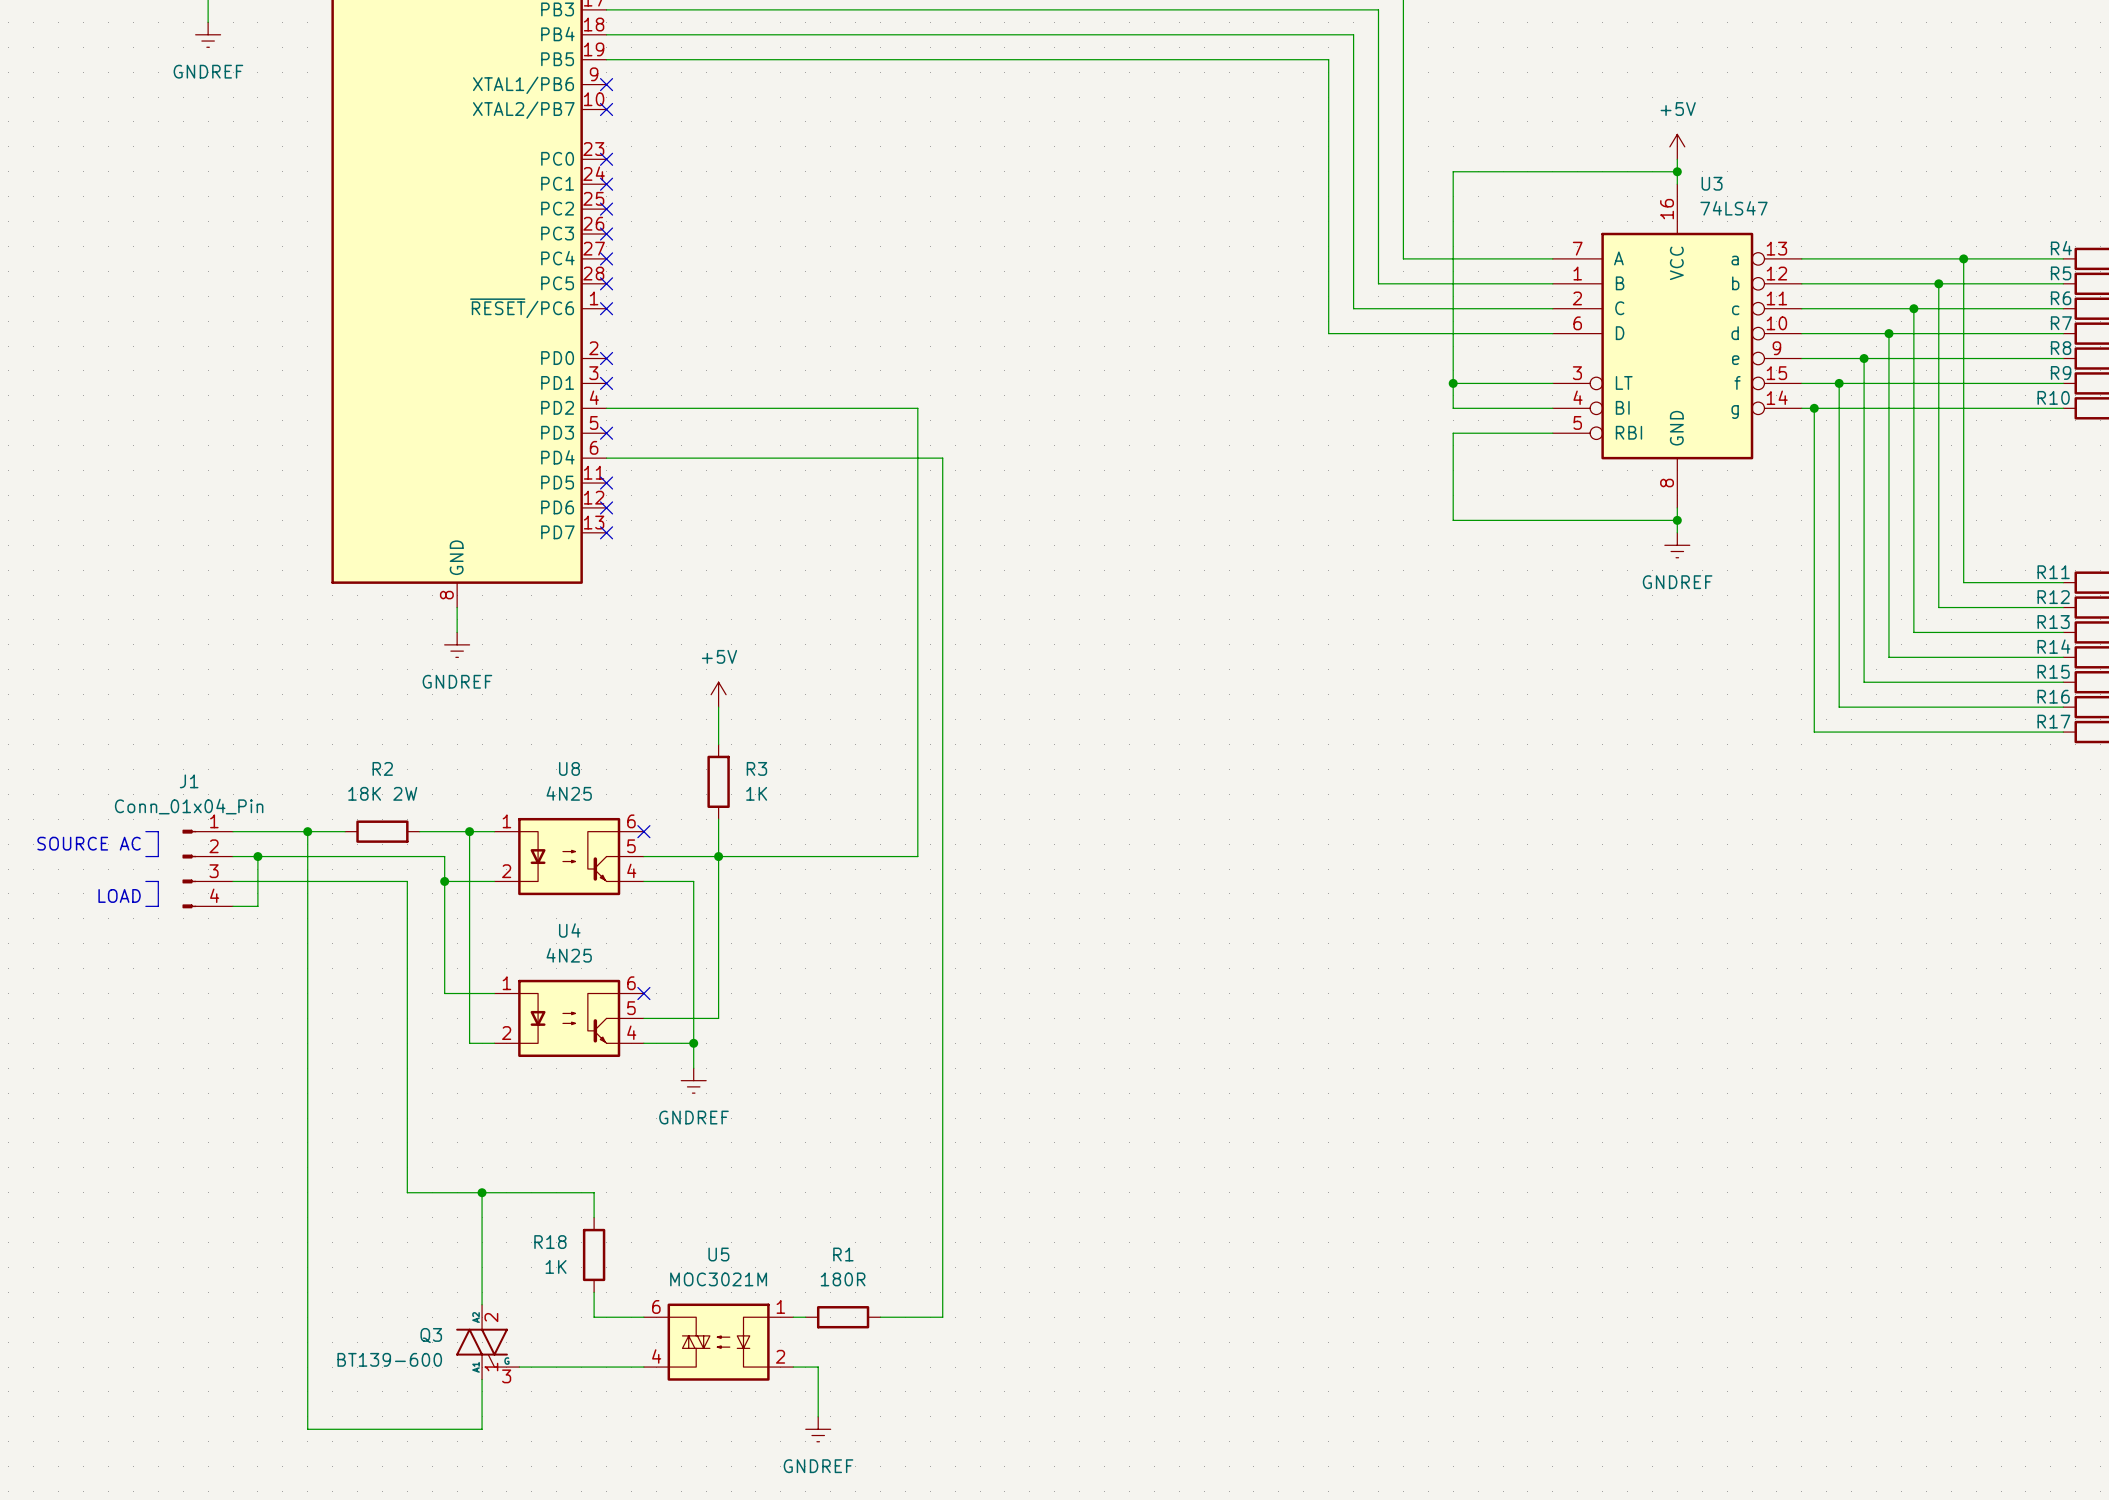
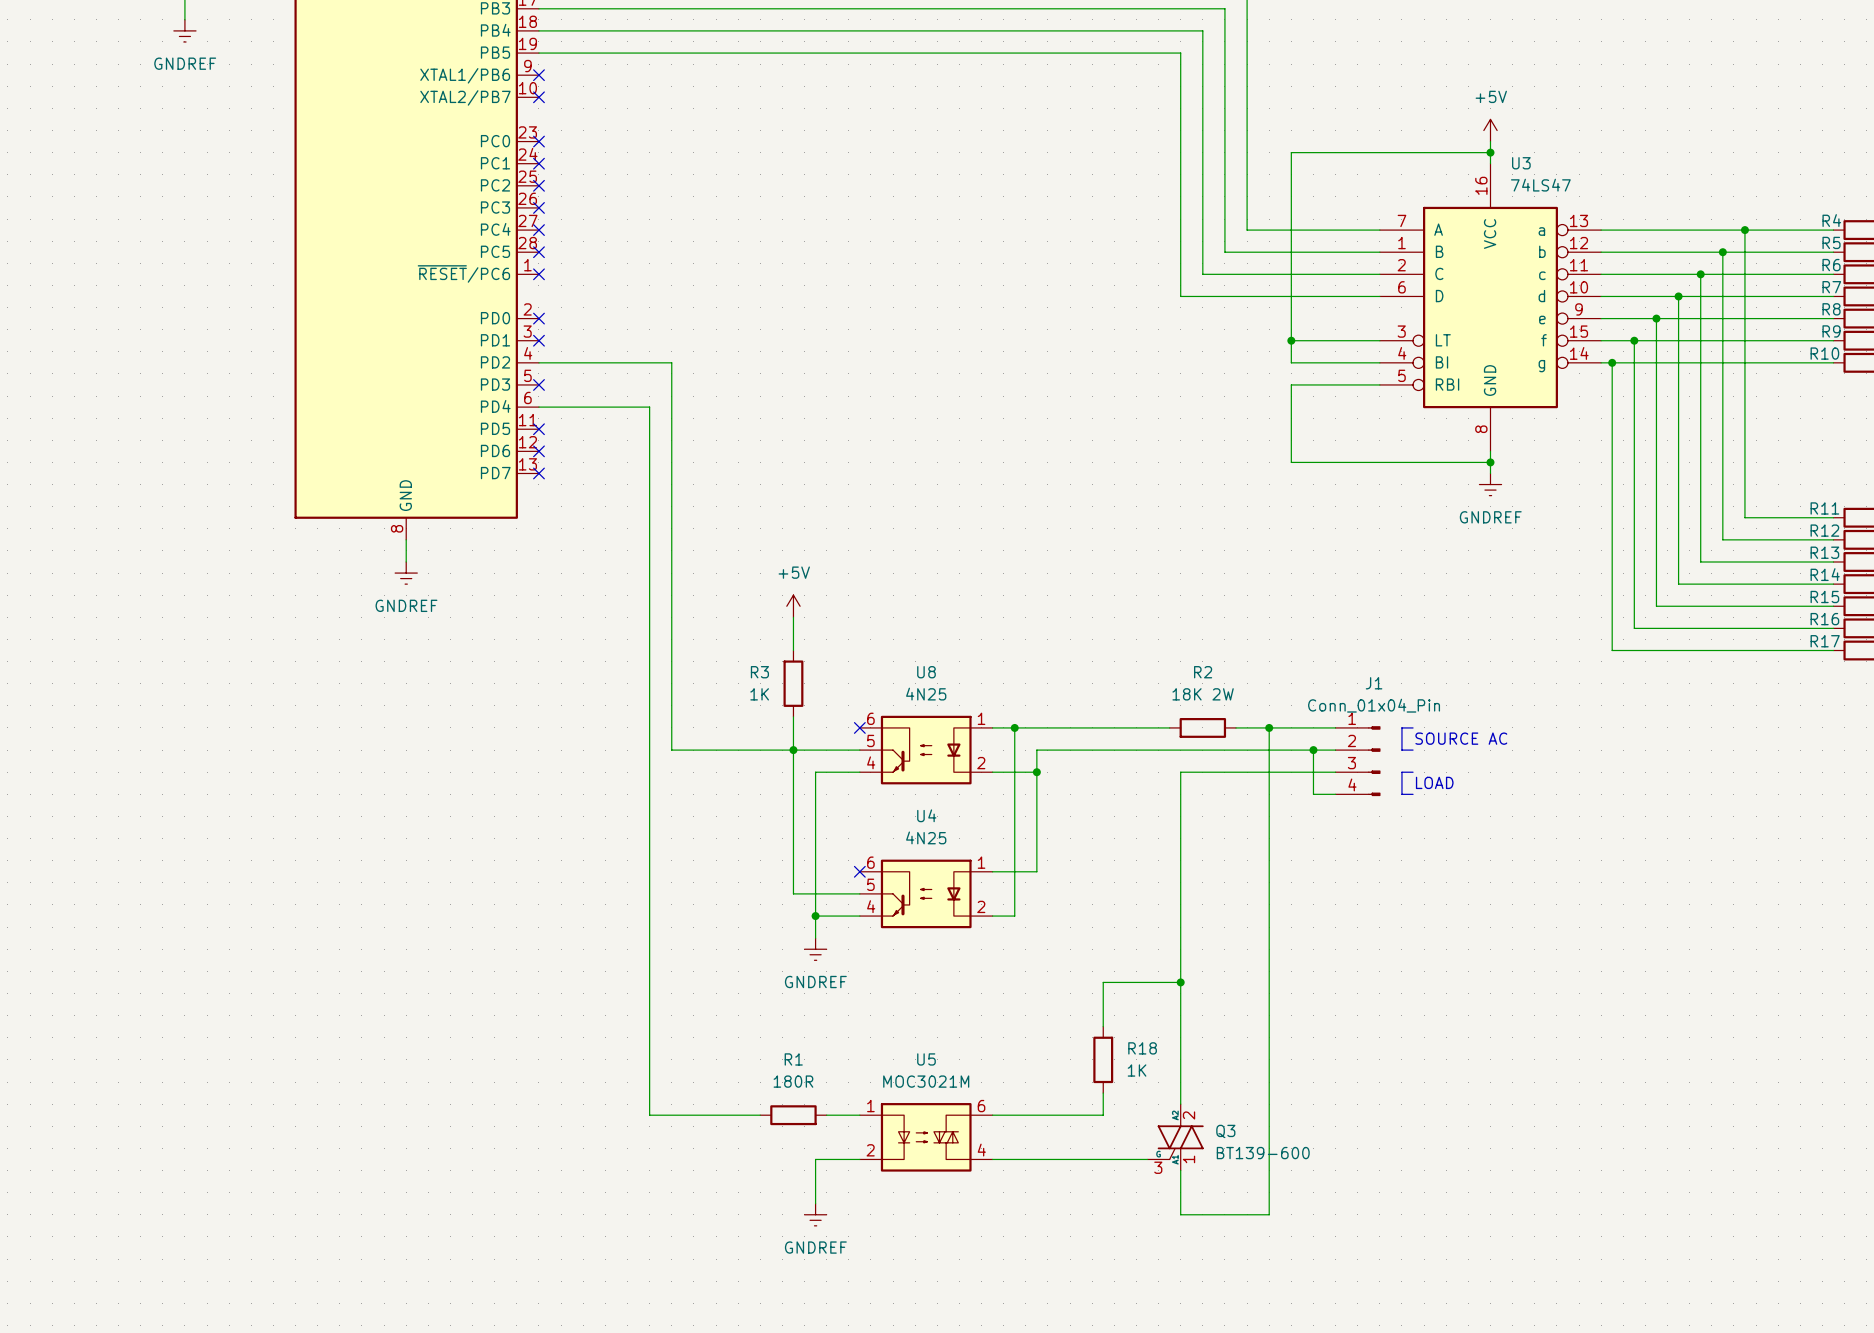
wire: (755, 408) (917, 408) (917, 856) (643, 856) -> (671, 362) (671, 750) (859, 750)
wire: (731, 458) (942, 458) (942, 1317) (880, 1317) -> (649, 407) (649, 1115) (760, 1115)
power symbol position: +5V (718, 694) -> +5V (793, 606)
wire: (718, 707) (718, 744) -> (793, 617) (793, 650)
R3 name position: R3 (756, 768) -> R3 (759, 672)
R3 position: (718, 781) -> (793, 683)
R3 value position: 1K (756, 793) -> 1K (759, 694)
wire: none -> (793, 716) (793, 893) (859, 893)
wire: (718, 819) (718, 1018) (643, 1018) -> none
no-connect mark: none -> (859, 727)
wire: none -> (992, 727) (1169, 727)
wire: none -> (1014, 727) (1014, 916) (992, 916)
junction: none -> (1014, 727)
wire: none -> (1236, 727) (1335, 727)
wire: none -> (1269, 727) (1269, 1214) (1180, 1214) (1180, 1170)
junction: none -> (1269, 727)
line: none -> (1413, 727) (1401, 727) (1401, 750) (1413, 750)
line: (145, 831) (158, 831) (158, 856) (145, 856) -> none
wire: (233, 831) (345, 831) -> none
wire: (307, 831) (307, 1429) (482, 1429) (482, 1379) -> none
junction: (307, 831) -> none
R2 position: (382, 831) -> (1202, 727)
wire: (419, 831) (494, 831) -> none
wire: (469, 831) (469, 1043) (494, 1043) -> none
junction: (469, 831) -> none
no-connect mark: (643, 831) -> none
text: none -> SOURCE AC (1461, 738)
text: SOURCE AC (89, 843) -> none
junction: none -> (793, 750)
wire: none -> (1313, 750) (1313, 794) (1335, 794)
junction: none -> (1313, 750)
wire: none -> (1335, 750) (1036, 750) (1036, 871) (992, 871)
wire: (233, 856) (444, 856) (444, 993) (494, 993) -> none
wire: (257, 856) (257, 906) (233, 906) -> none
junction: (257, 856) -> none
U8 flip: as is (569, 856) -> left-right (926, 750)
U8 position: (569, 856) -> (926, 750)
junction: (718, 856) -> none
J1 flip: as is (189, 869) -> left-right (1374, 761)
J1 position: (207, 869) -> (1358, 761)
wire: none -> (859, 772) (815, 772) (815, 938)
wire: none -> (992, 772) (1036, 772)
junction: none -> (1036, 772)
wire: none -> (1335, 772) (1180, 772) (1180, 1104)
line: none -> (1413, 772) (1401, 772) (1401, 794) (1413, 794)
line: (145, 881) (158, 881) (158, 906) (145, 906) -> none
wire: (233, 881) (407, 881) (407, 1192) (594, 1192) (594, 1217) -> none
wire: (444, 881) (494, 881) -> none
junction: (444, 881) -> none
wire: (643, 881) (693, 881) (693, 1068) -> none
text: none -> LOAD (1434, 782)
text: LOAD (119, 895) -> none
no-connect mark: none -> (859, 871)
no-connect mark: (643, 993) -> none
U4 flip: as is (569, 1018) -> left-right (926, 893)
U4 position: (569, 1018) -> (926, 893)
wire: none -> (815, 916) (859, 916)
junction: none -> (815, 916)
wire: (643, 1043) (693, 1043) -> none
junction: (693, 1043) -> none
power symbol: none -> GNDREF (815, 949)
power symbol: GNDREF (693, 1080) -> none
wire: none -> (1180, 982) (1103, 982) (1103, 1026)
junction: none -> (1180, 982)
wire: (482, 1192) (482, 1304) -> none
junction: (482, 1192) -> none
wire: none -> (1103, 1093) (1103, 1115) (992, 1115)
R18 name position: R18 (550, 1242) -> R18 (1142, 1048)
R18 position: (594, 1254) -> (1103, 1059)
wire: none -> (826, 1115) (859, 1115)
R18 value position: 1K (556, 1266) -> 1K (1137, 1070)
wire: (594, 1292) (594, 1317) (643, 1317) -> none
wire: none -> (859, 1159) (815, 1159) (815, 1203)
wire: none -> (992, 1159) (1147, 1159)
wire: (793, 1317) (805, 1317) -> none
R1 position: (843, 1317) -> (793, 1115)
Q3 position: (487, 1342) -> (1175, 1137)
U5 flip: as is (718, 1342) -> left-right (926, 1137)
U5 position: (718, 1342) -> (926, 1137)
Q3 flip: as is (482, 1347) -> left-right (1180, 1142)
wire: (519, 1367) (643, 1367) -> none
wire: (793, 1367) (818, 1367) (818, 1416) -> none
power symbol position: GNDREF (818, 1429) -> GNDREF (815, 1214)

